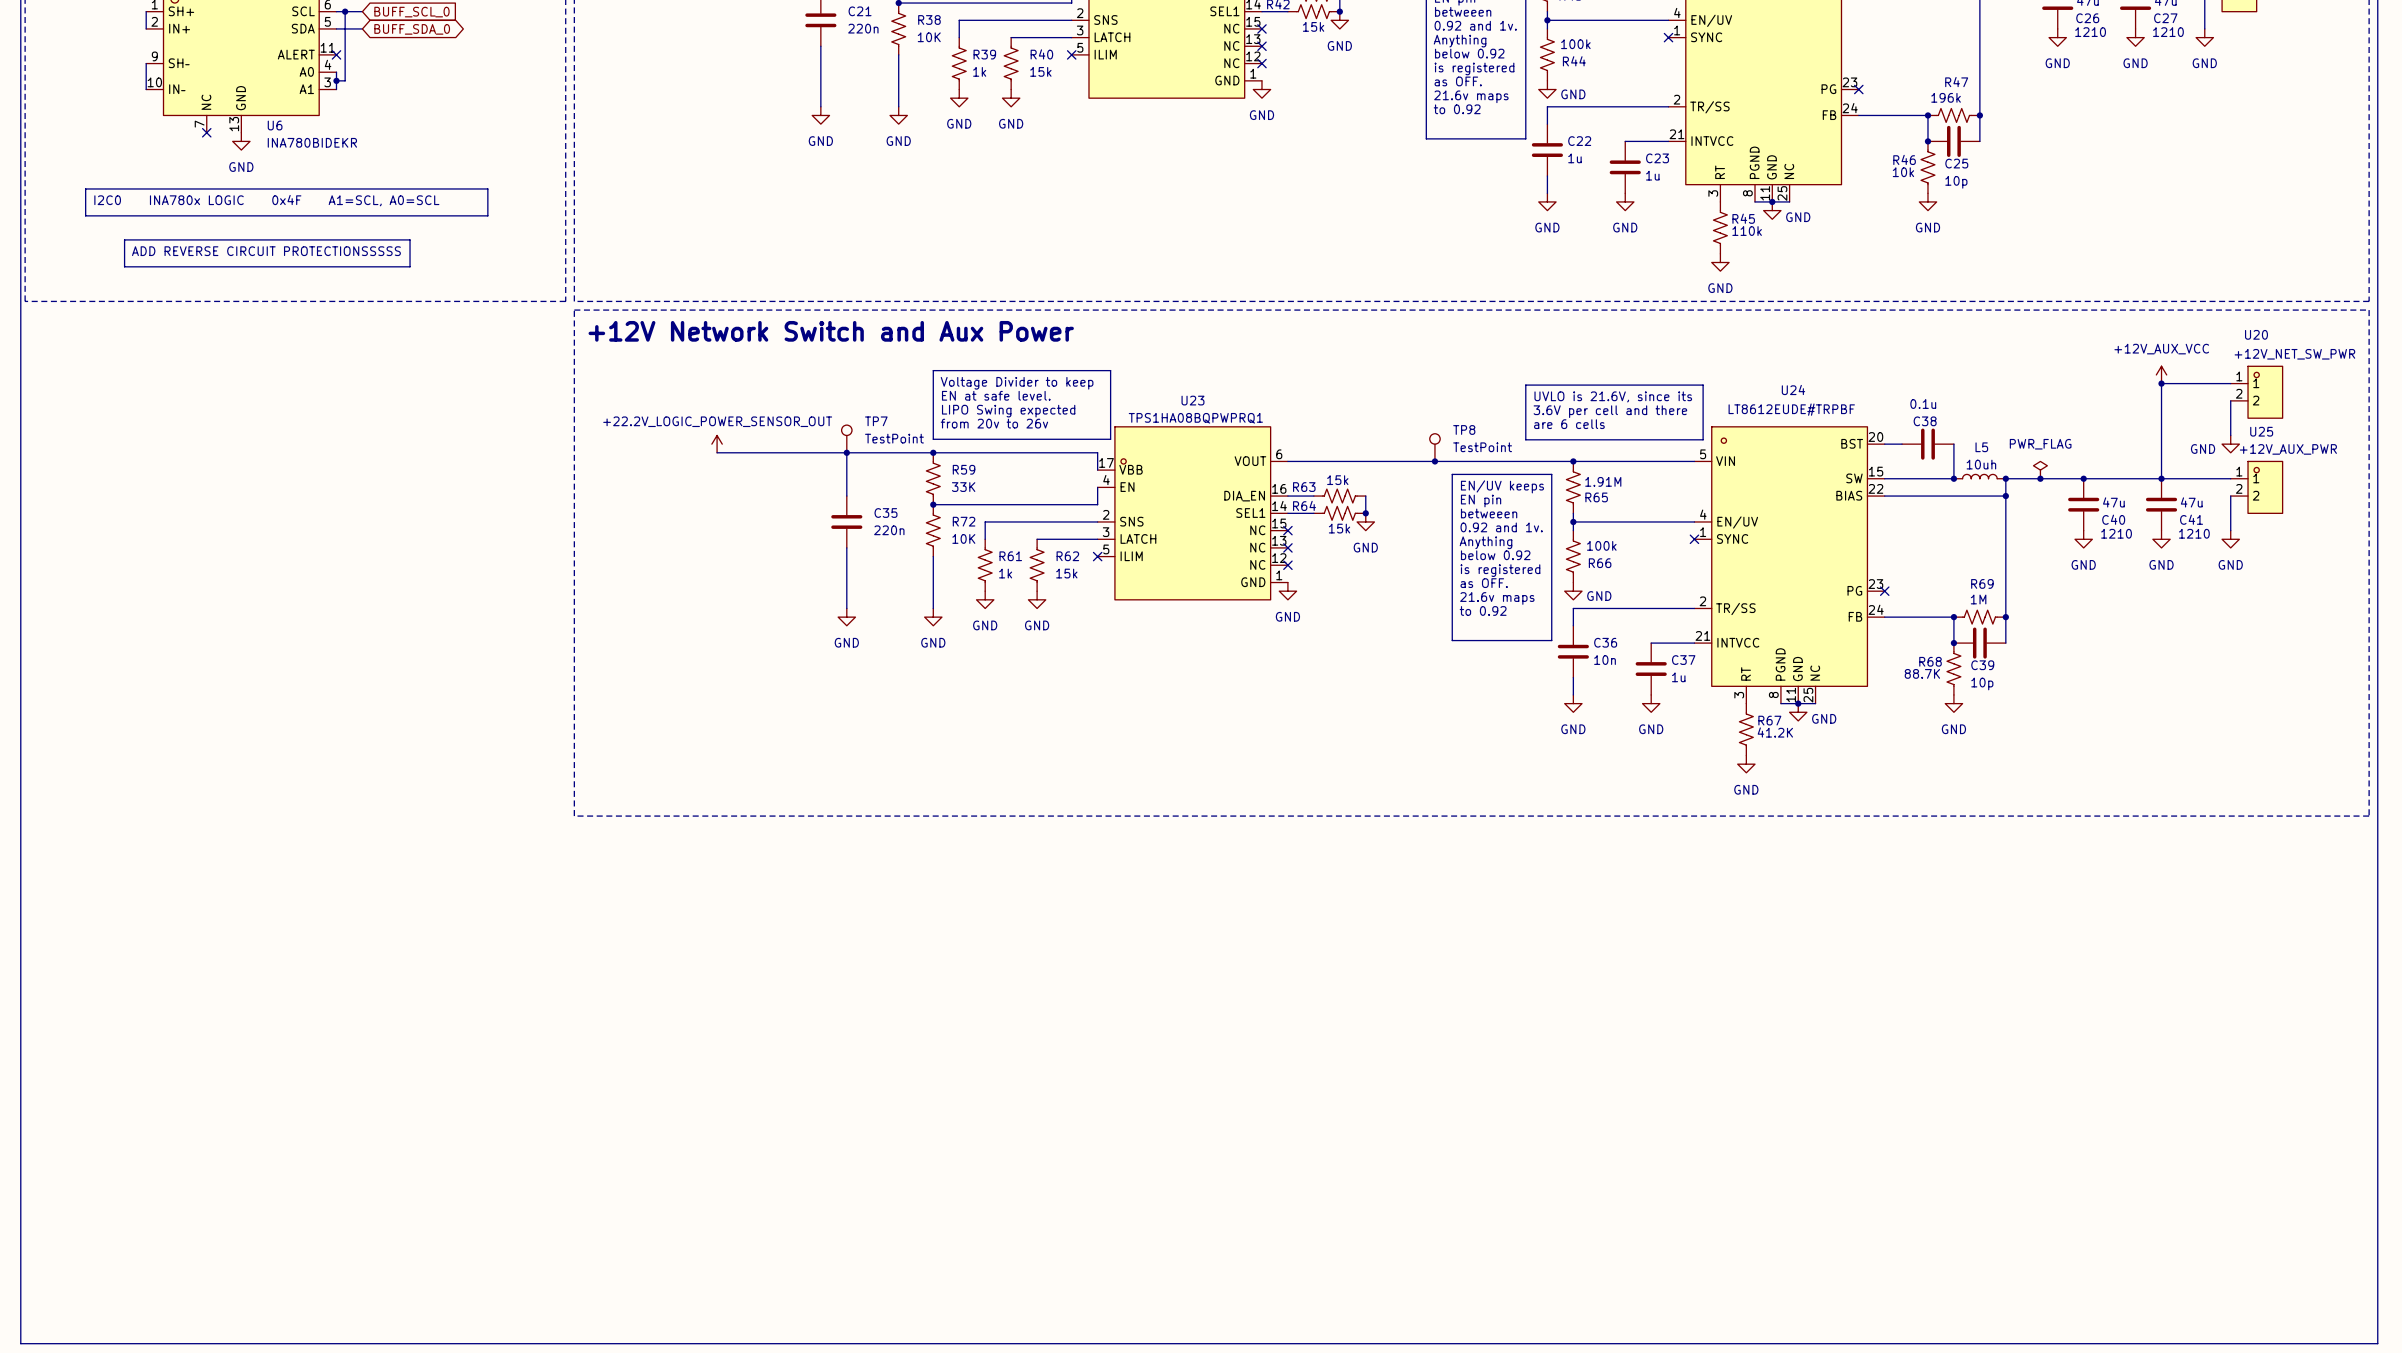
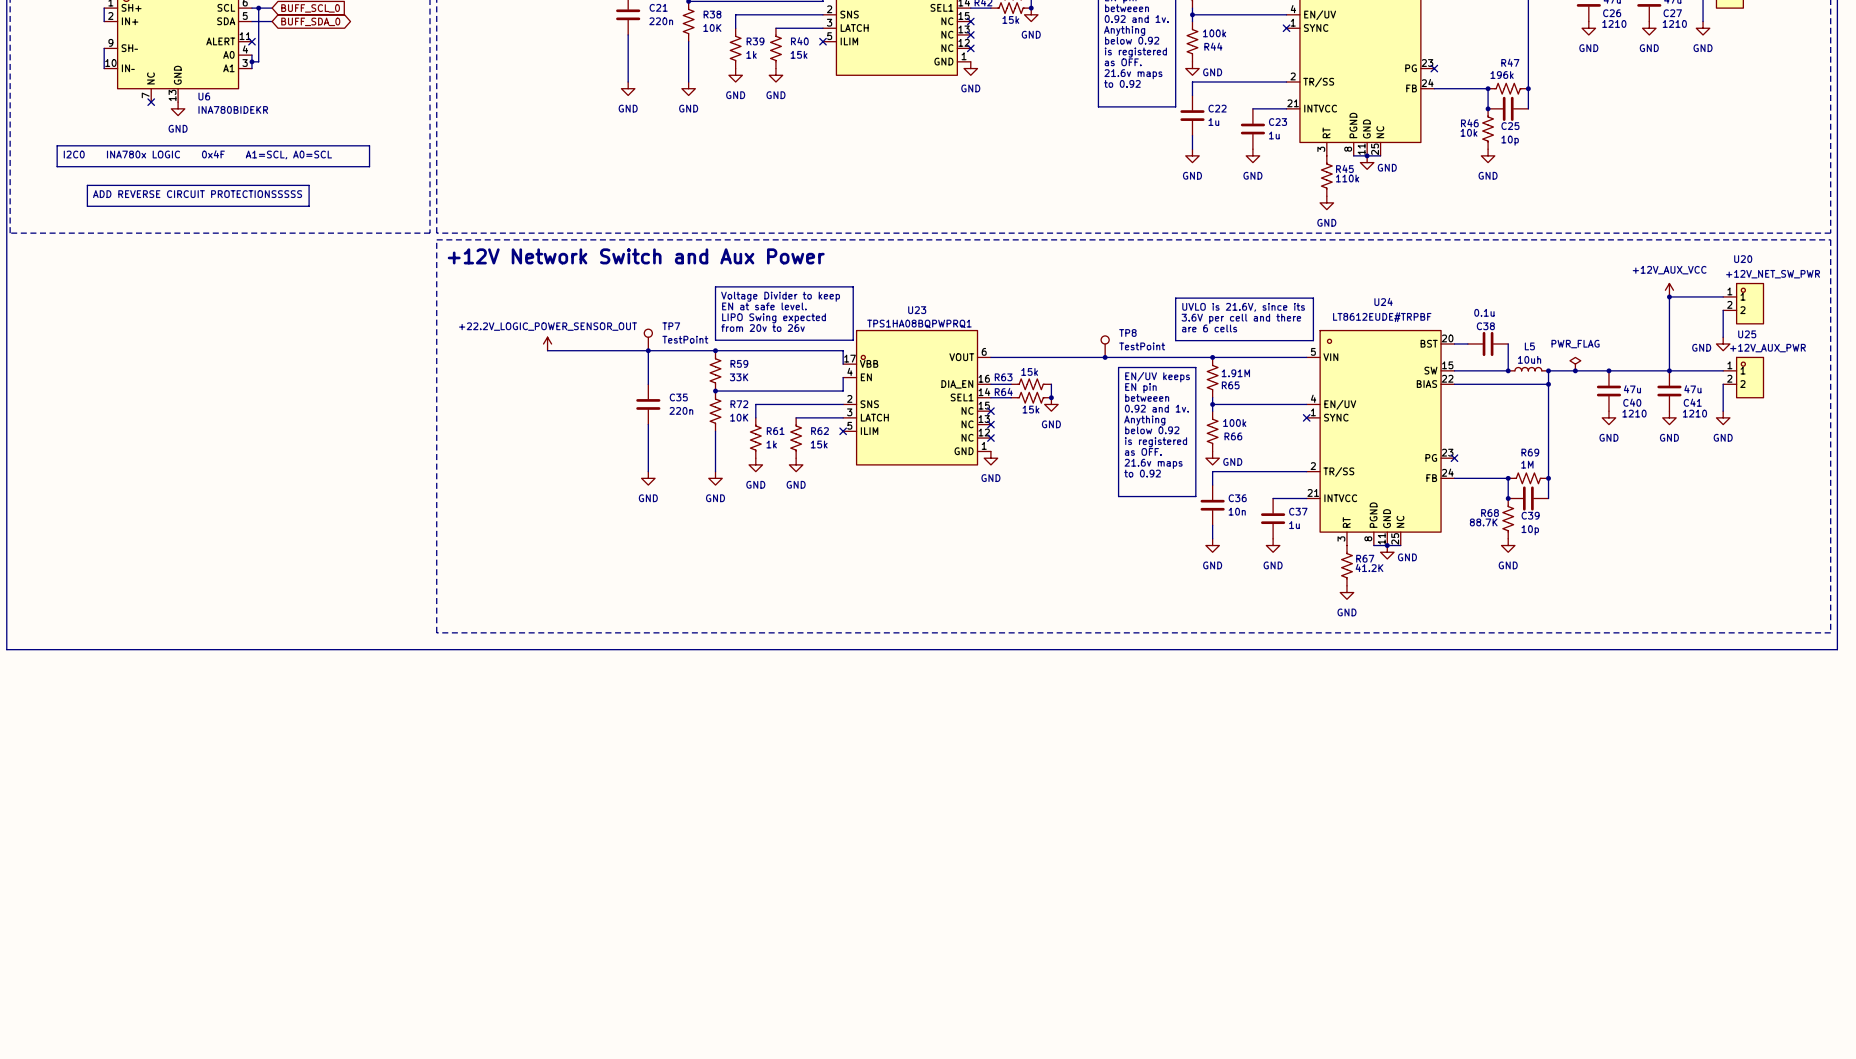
line: (20, 837) (20, 1343) (2377, 1343) (2377, 837) -> (6, 649) (1837, 649)

